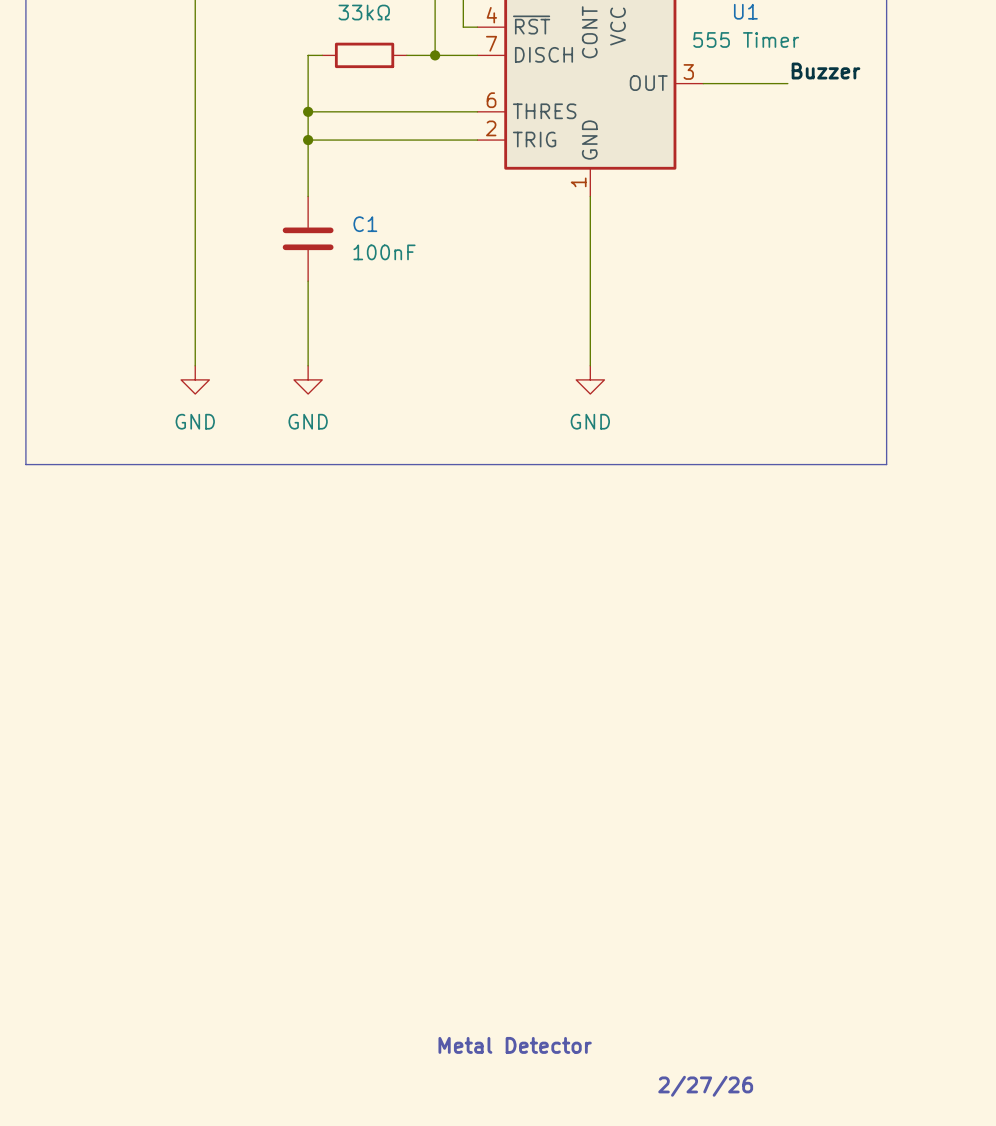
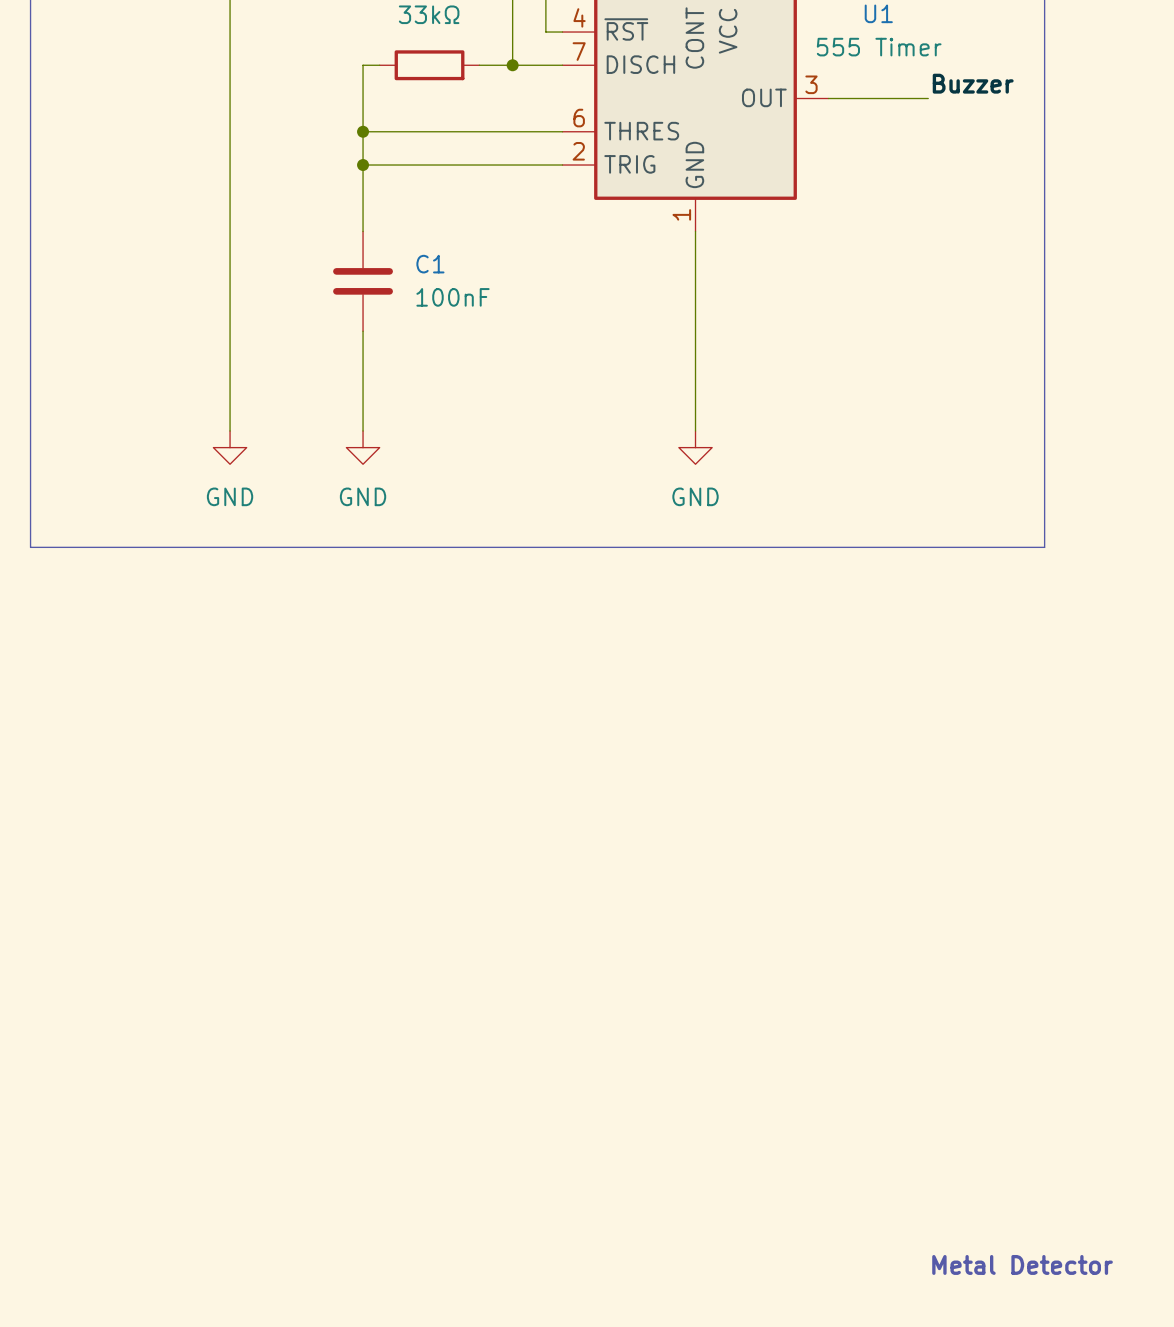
text: Metal Detector (515, 1045) -> none
text: none -> Metal Detector (1022, 1264)
text: 2/27/26 (705, 1086) -> none

